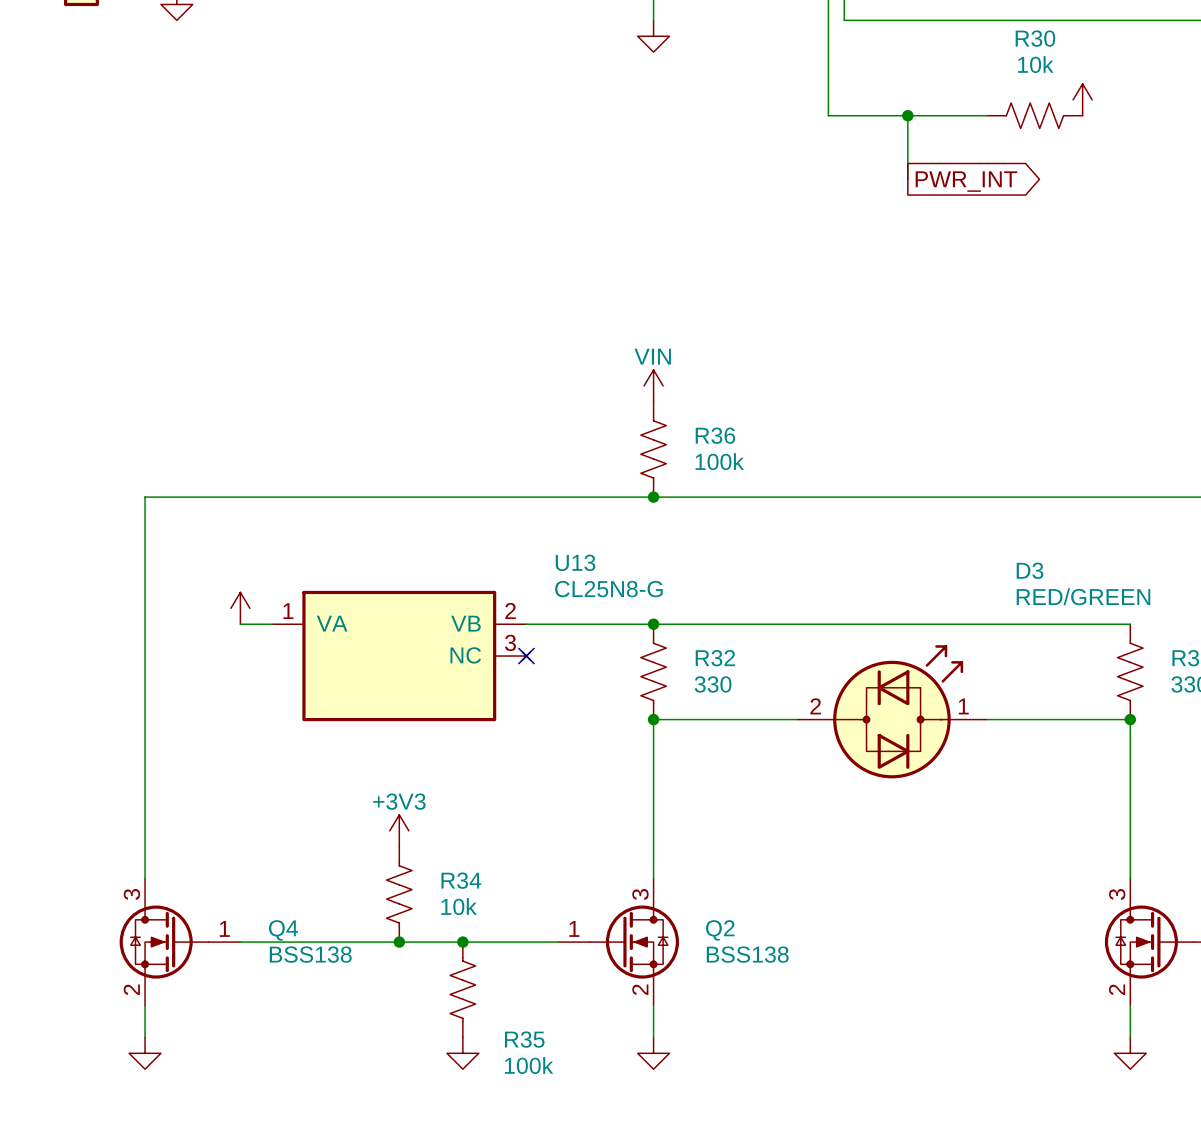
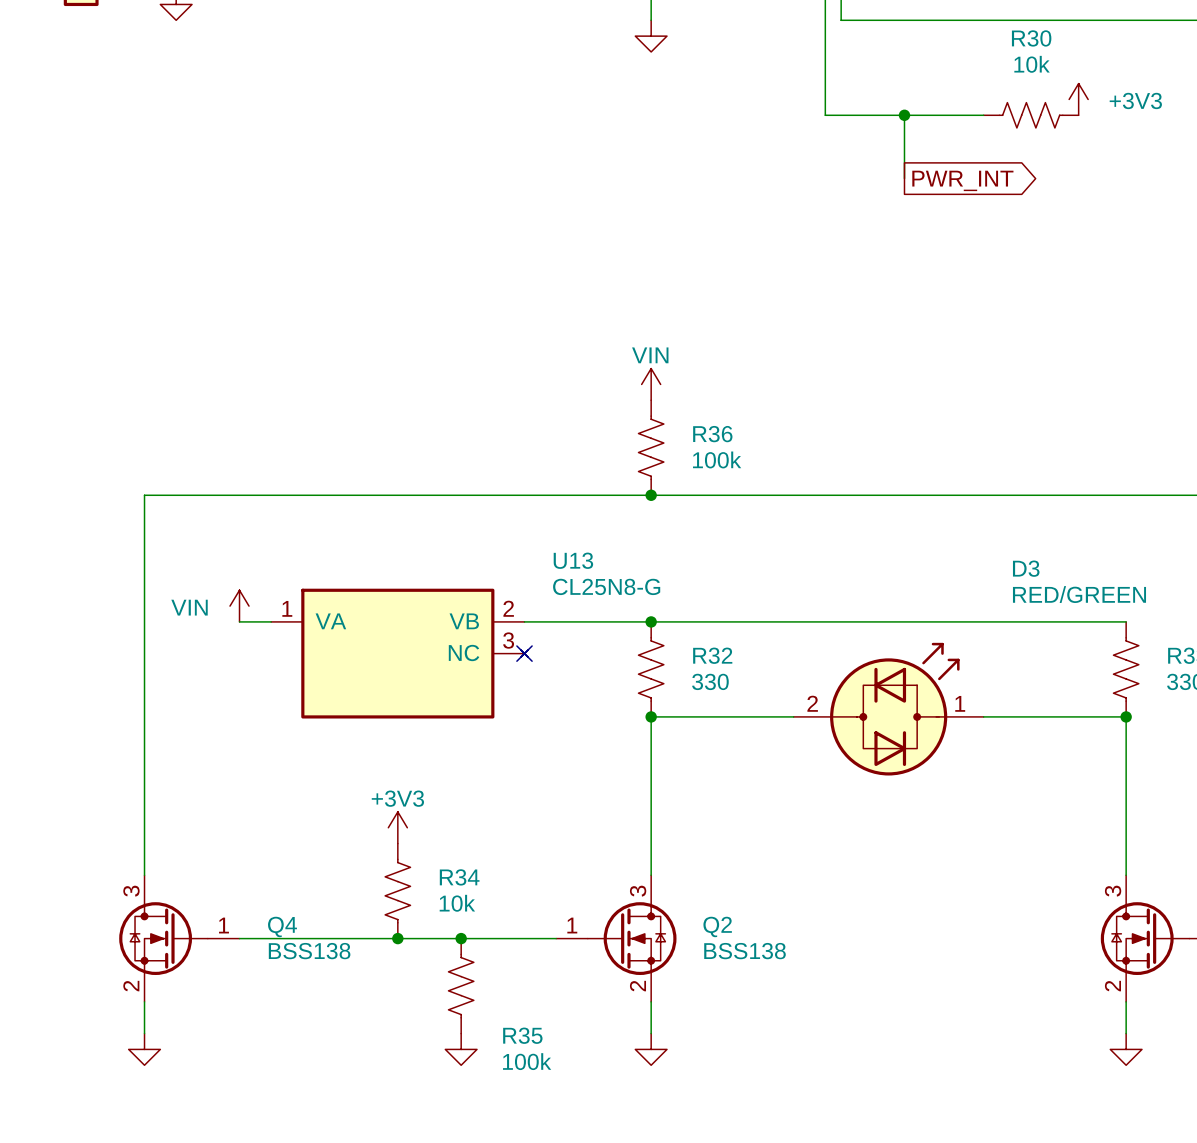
power symbol text: none -> +3V3 (1135, 100)
power symbol text: none -> VIN (189, 607)

